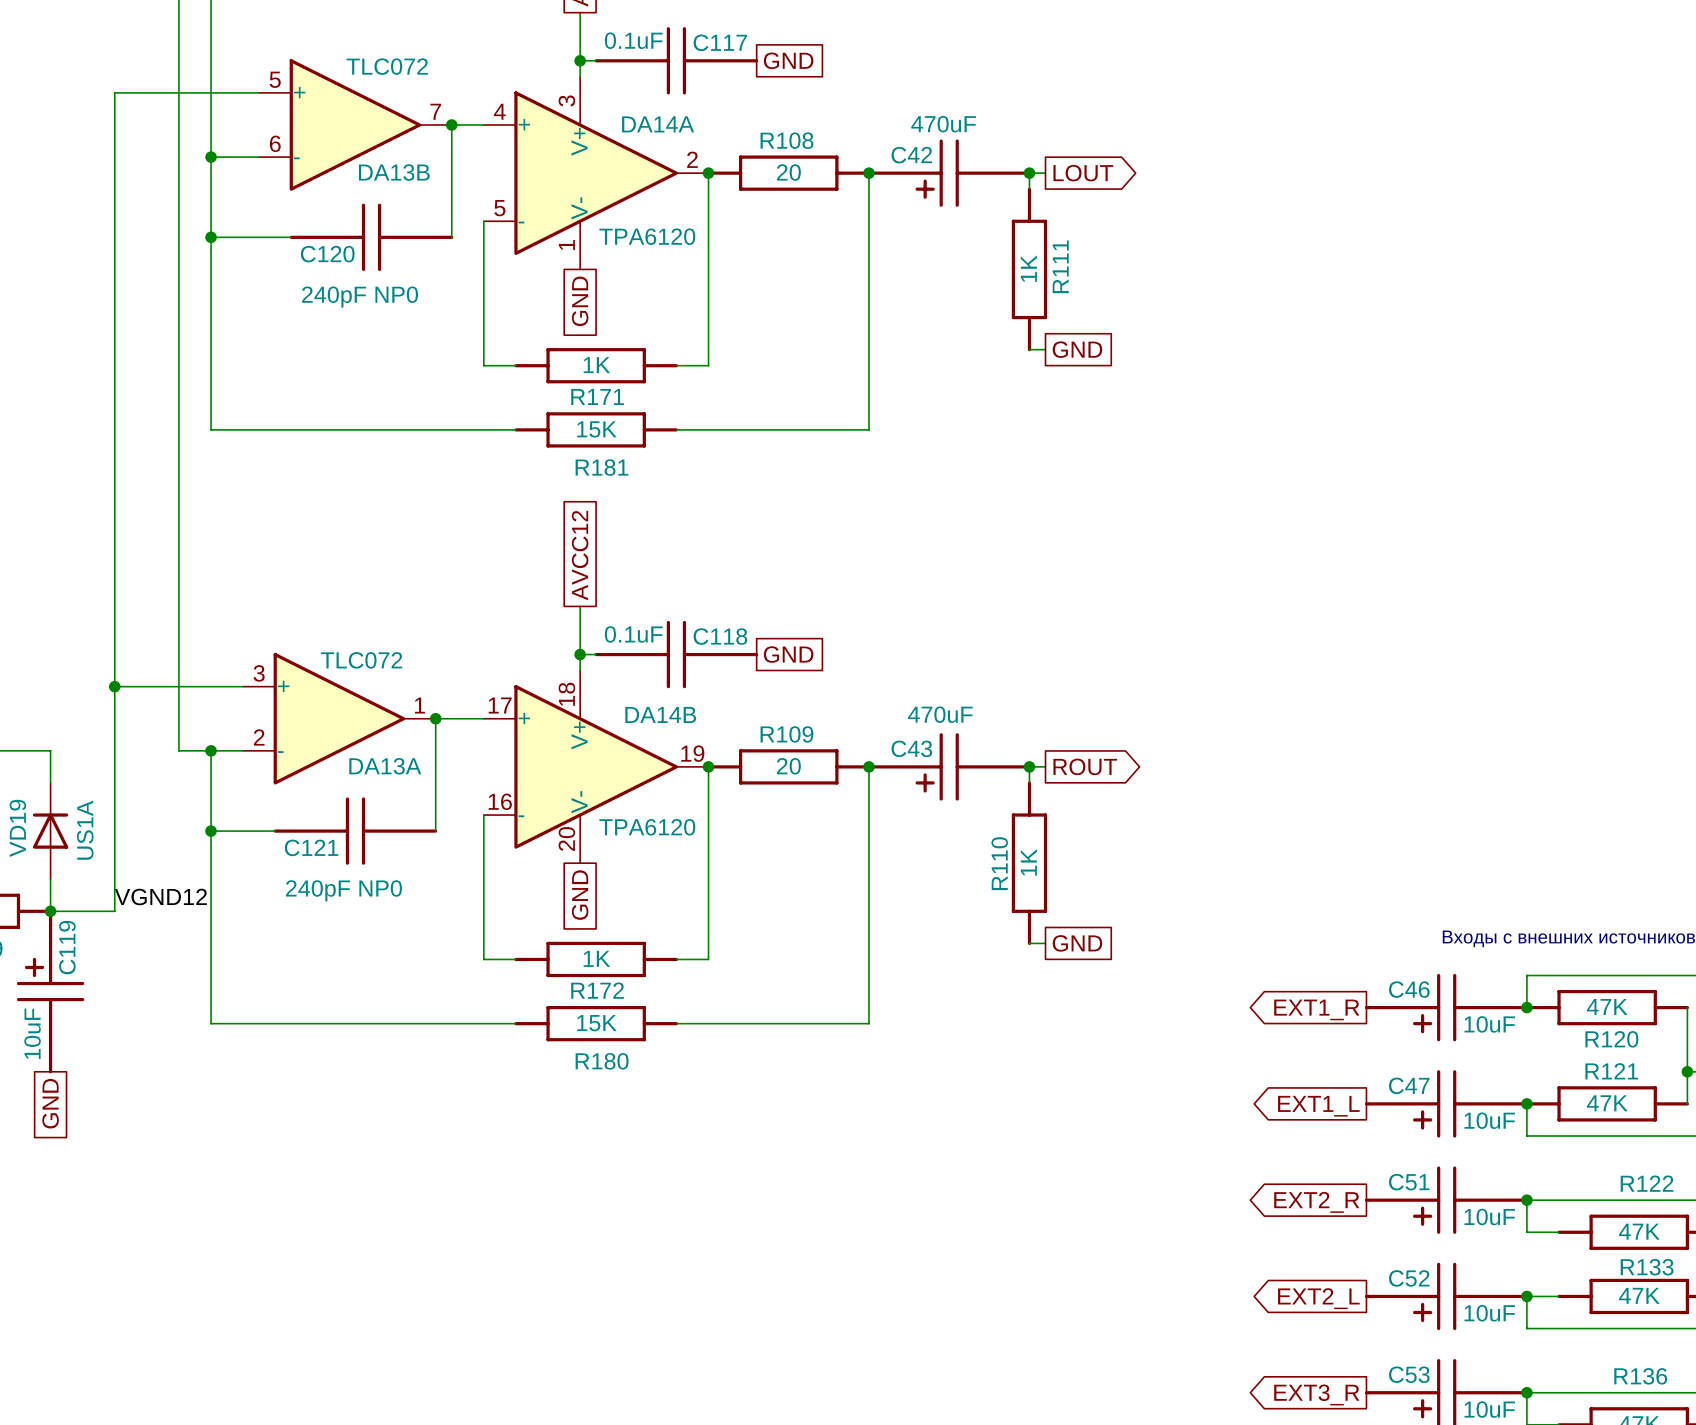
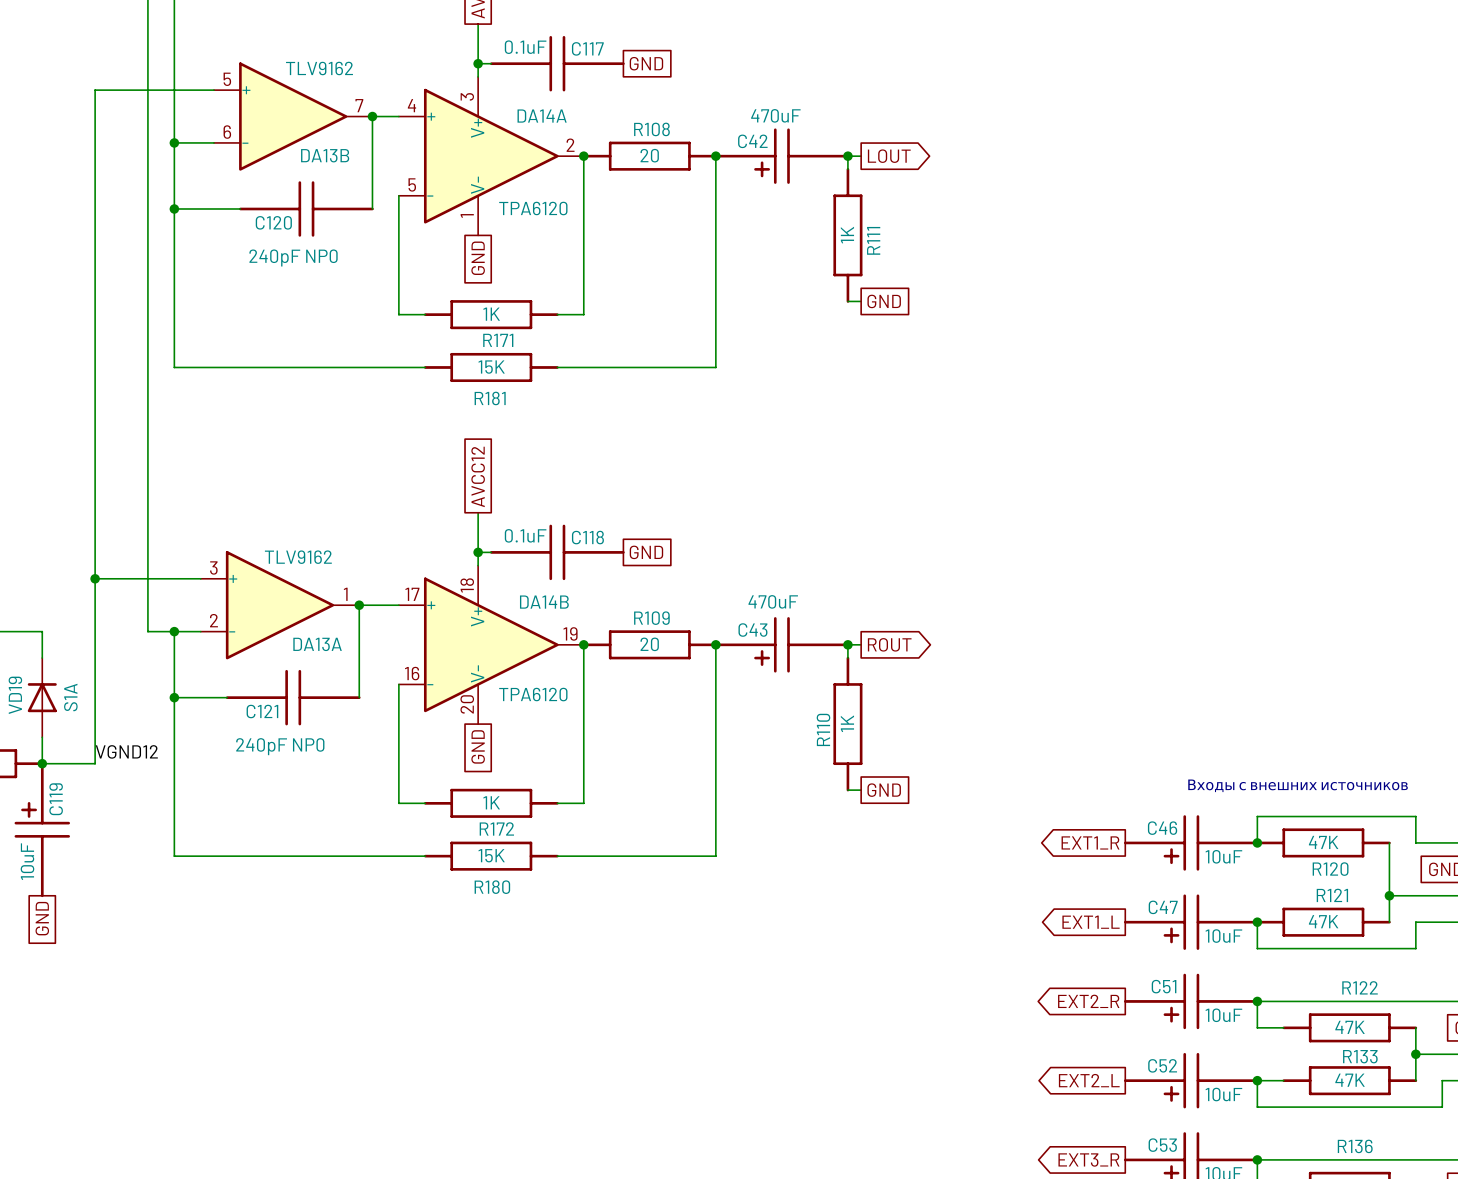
DA13B value: TLC072 (387, 66) -> TLV9162 (319, 68)
DA13A value: TLC072 (361, 660) -> TLV9162 (298, 557)
VD19 value: US1A (85, 830) -> S1A (70, 697)

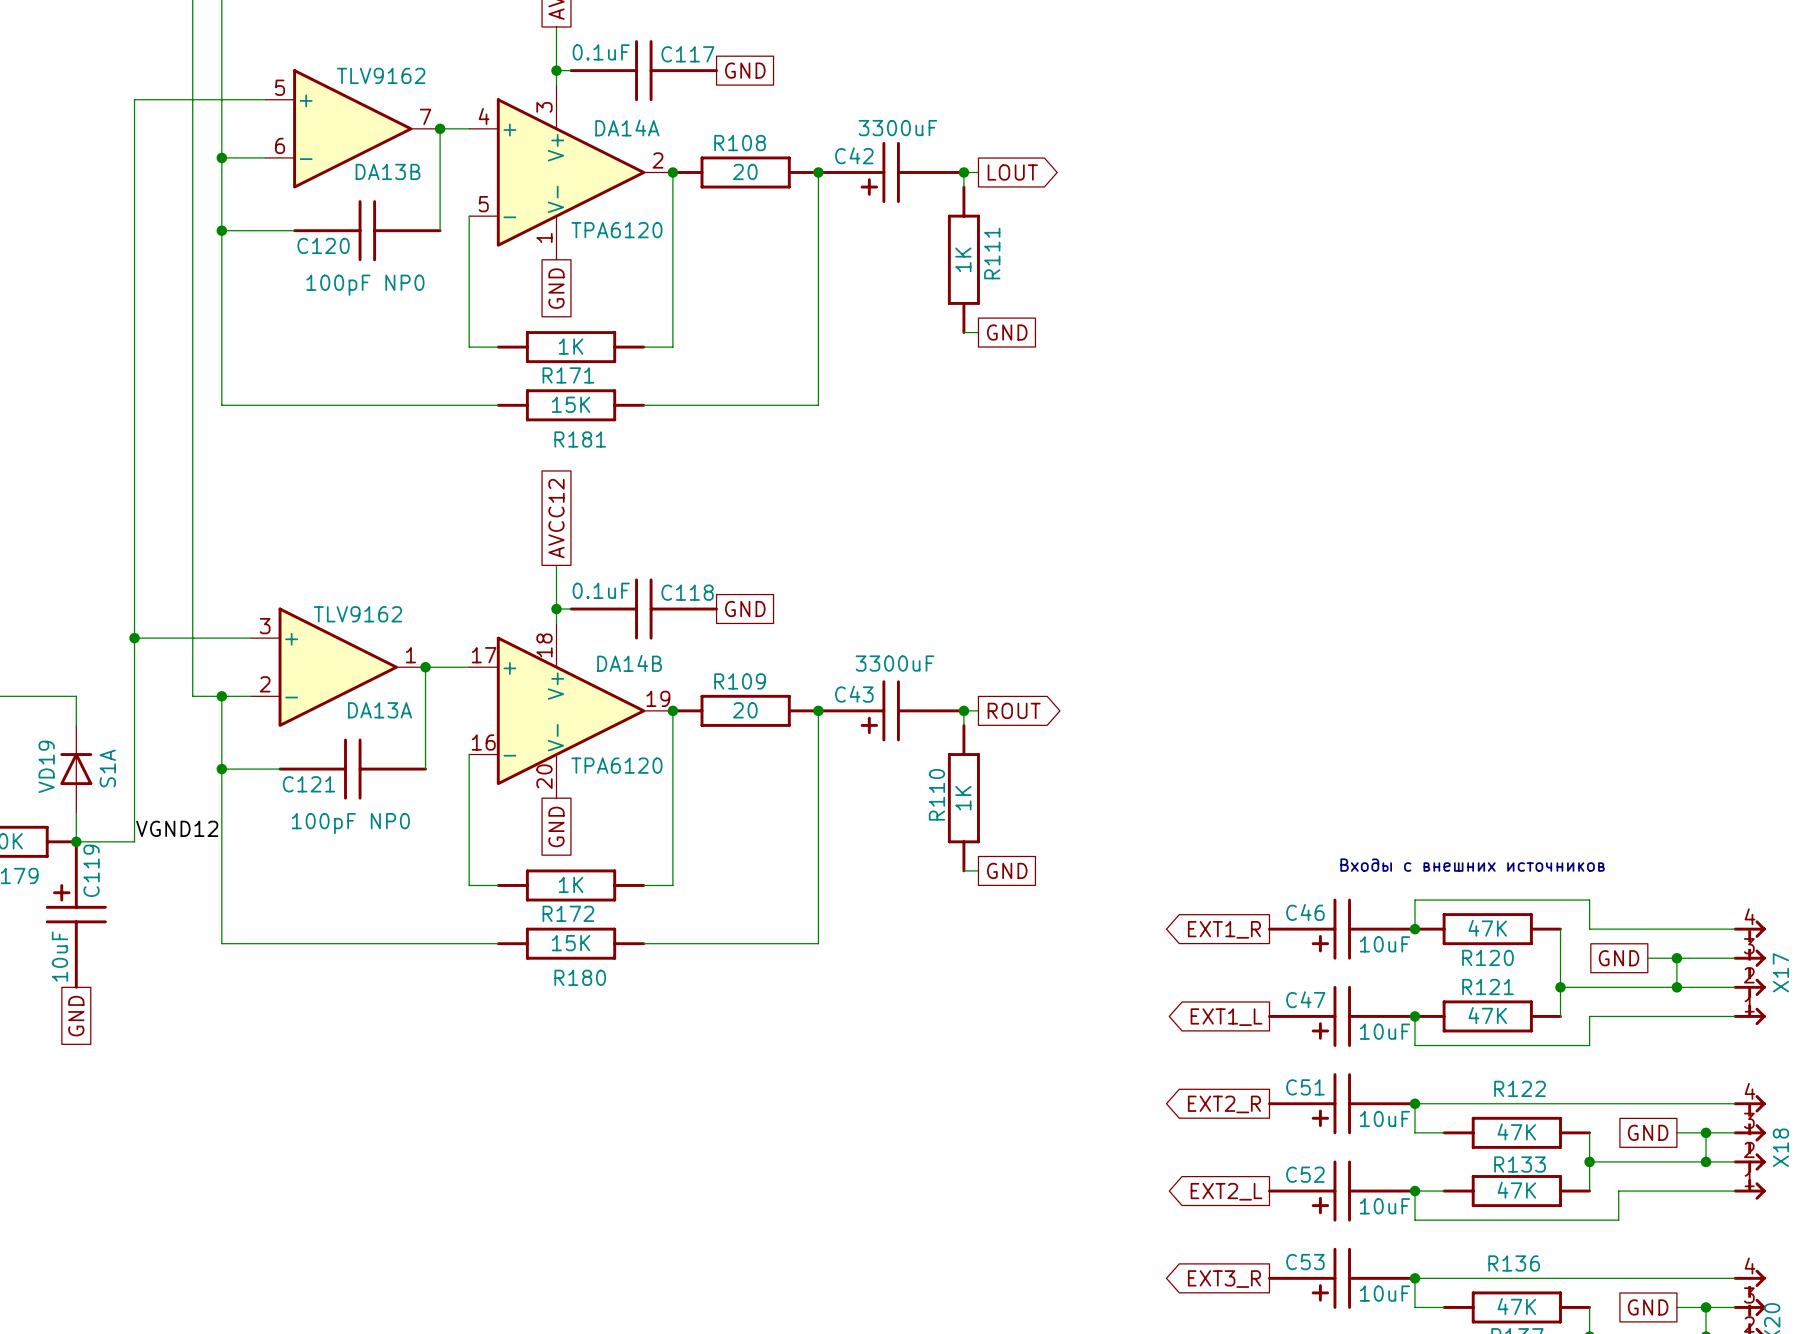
C42 value: 470uF (775, 115) -> 3300uF (897, 128)
C120 value: 240pF NP0 (293, 257) -> 100pF NP0 (365, 285)
C43 value: 470uF (773, 601) -> 3300uF (895, 663)
C121 value: 240pF NP0 (280, 746) -> 100pF NP0 (350, 823)

